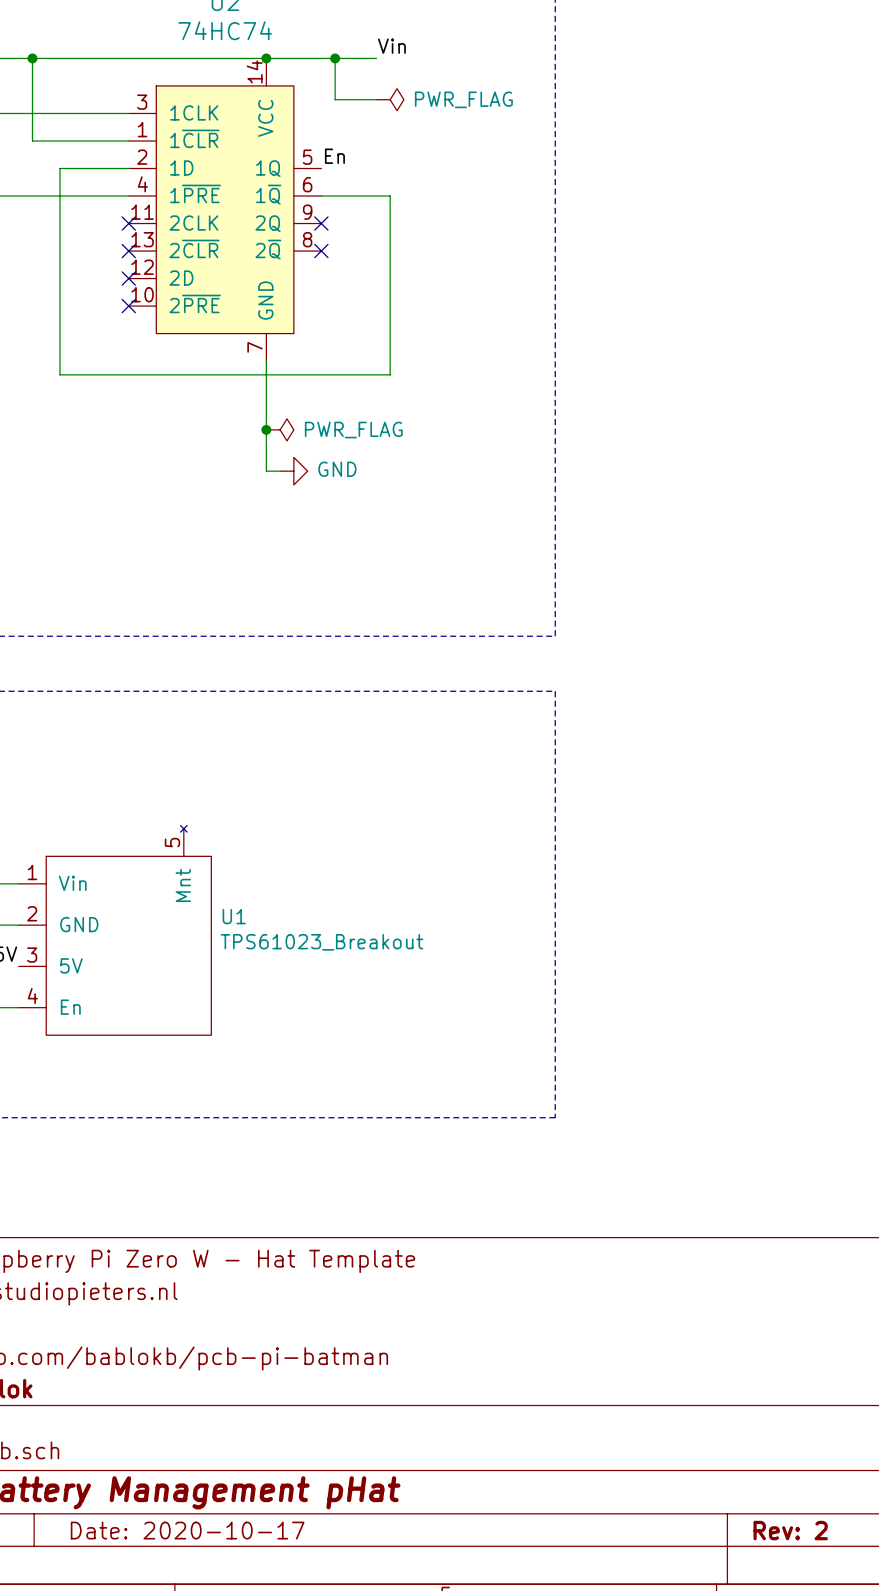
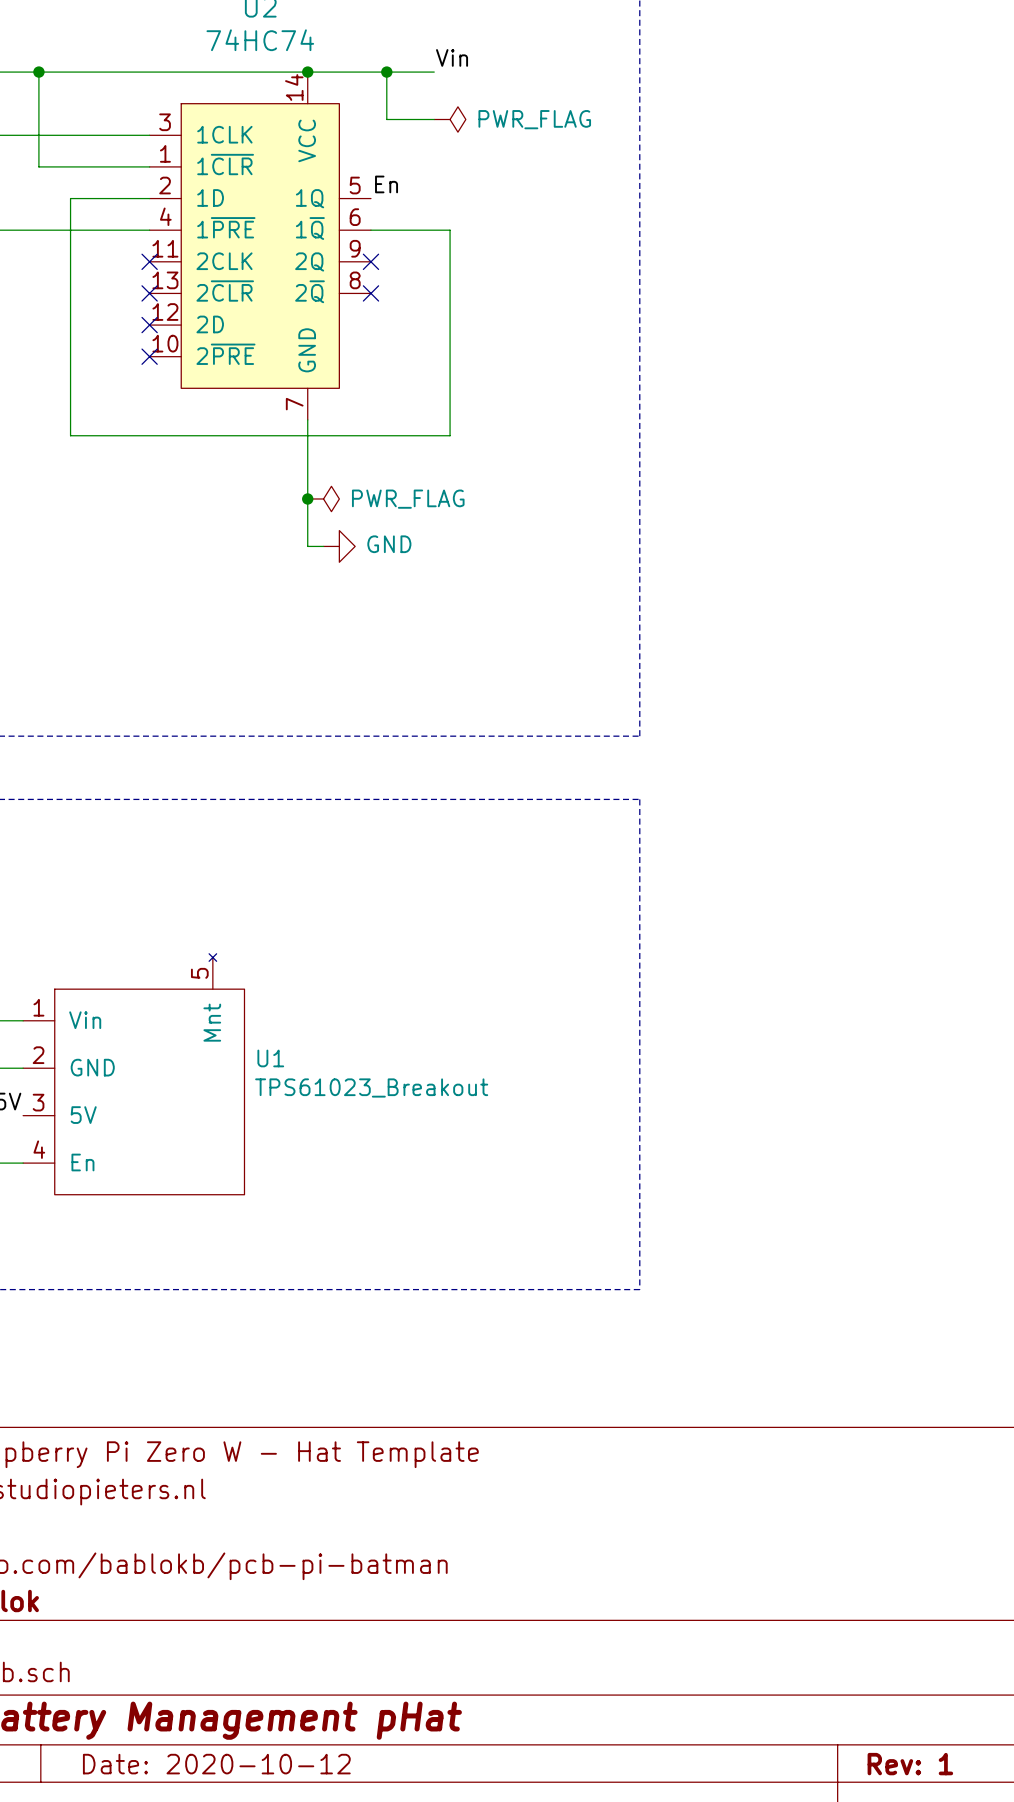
title block: Date: 2020-10-17 (187, 1530) -> Date: 2020-10-12 (216, 1764)
title block: Rev: 2 (790, 1530) -> Rev: 1 (910, 1764)

